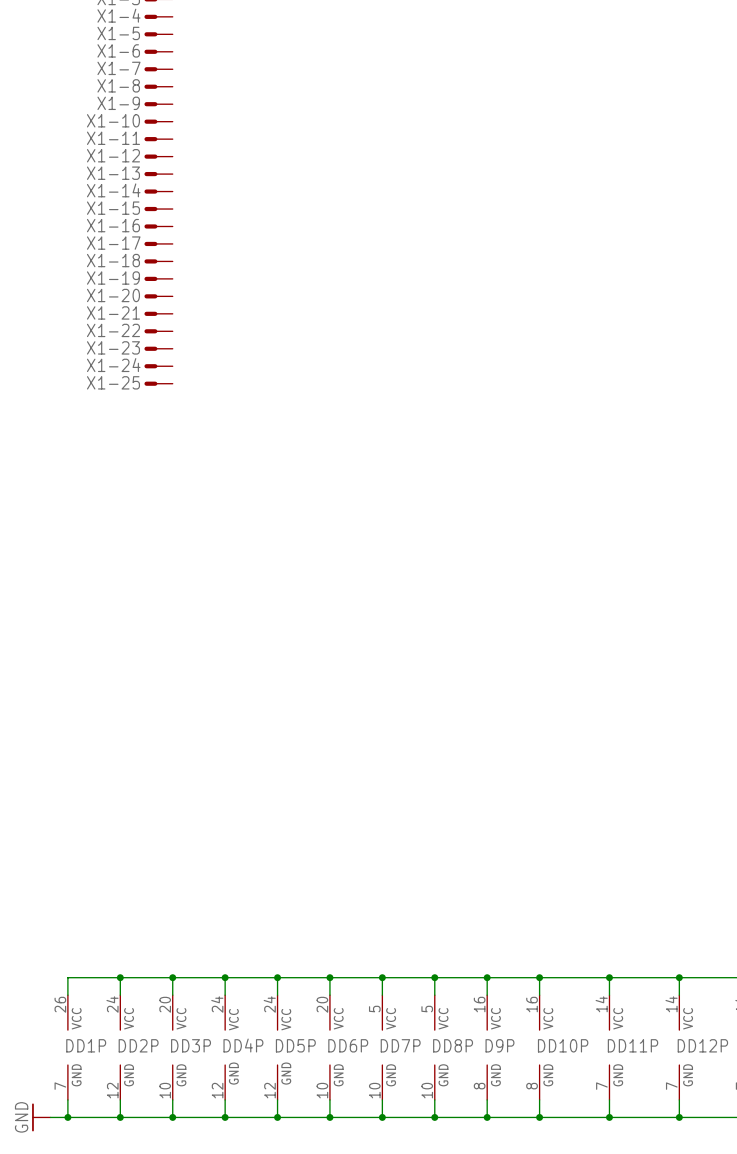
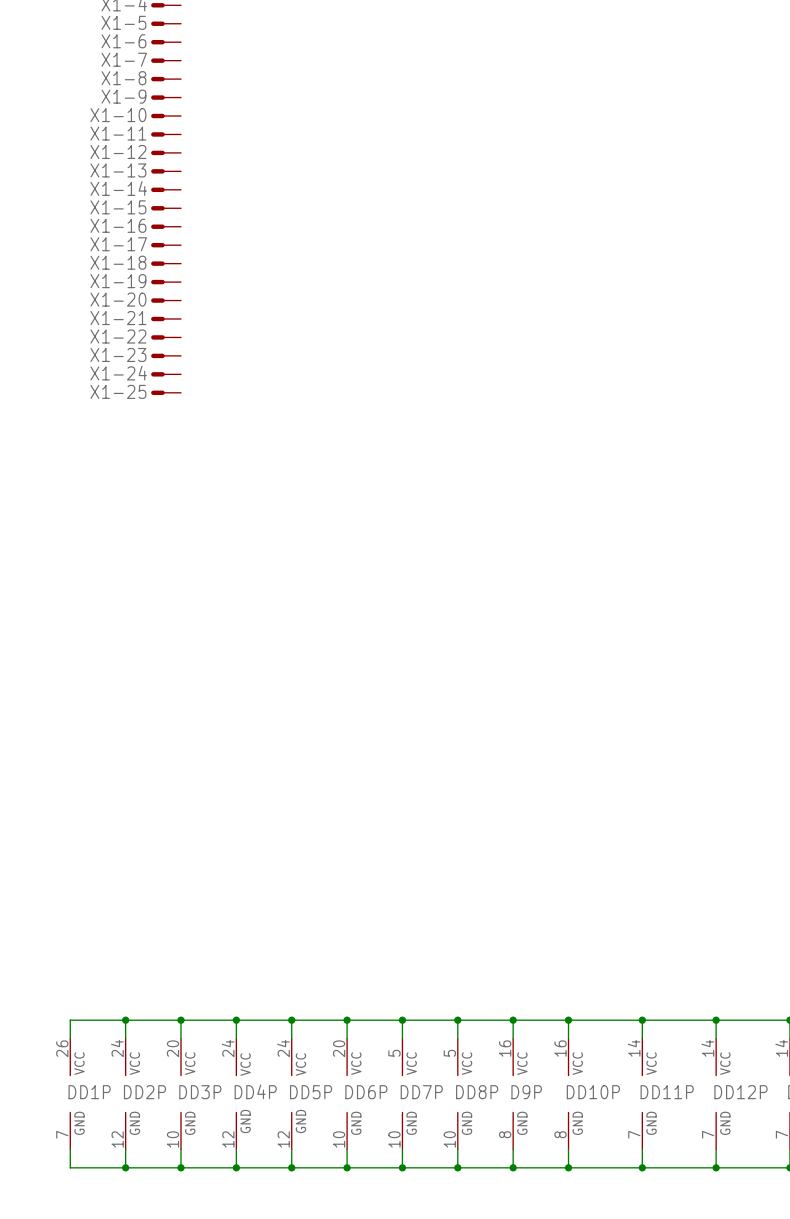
power symbol: GND (41, 1117) -> none
wire: (50, 1117) (67, 1117) -> none
junction: (67, 1117) -> none

